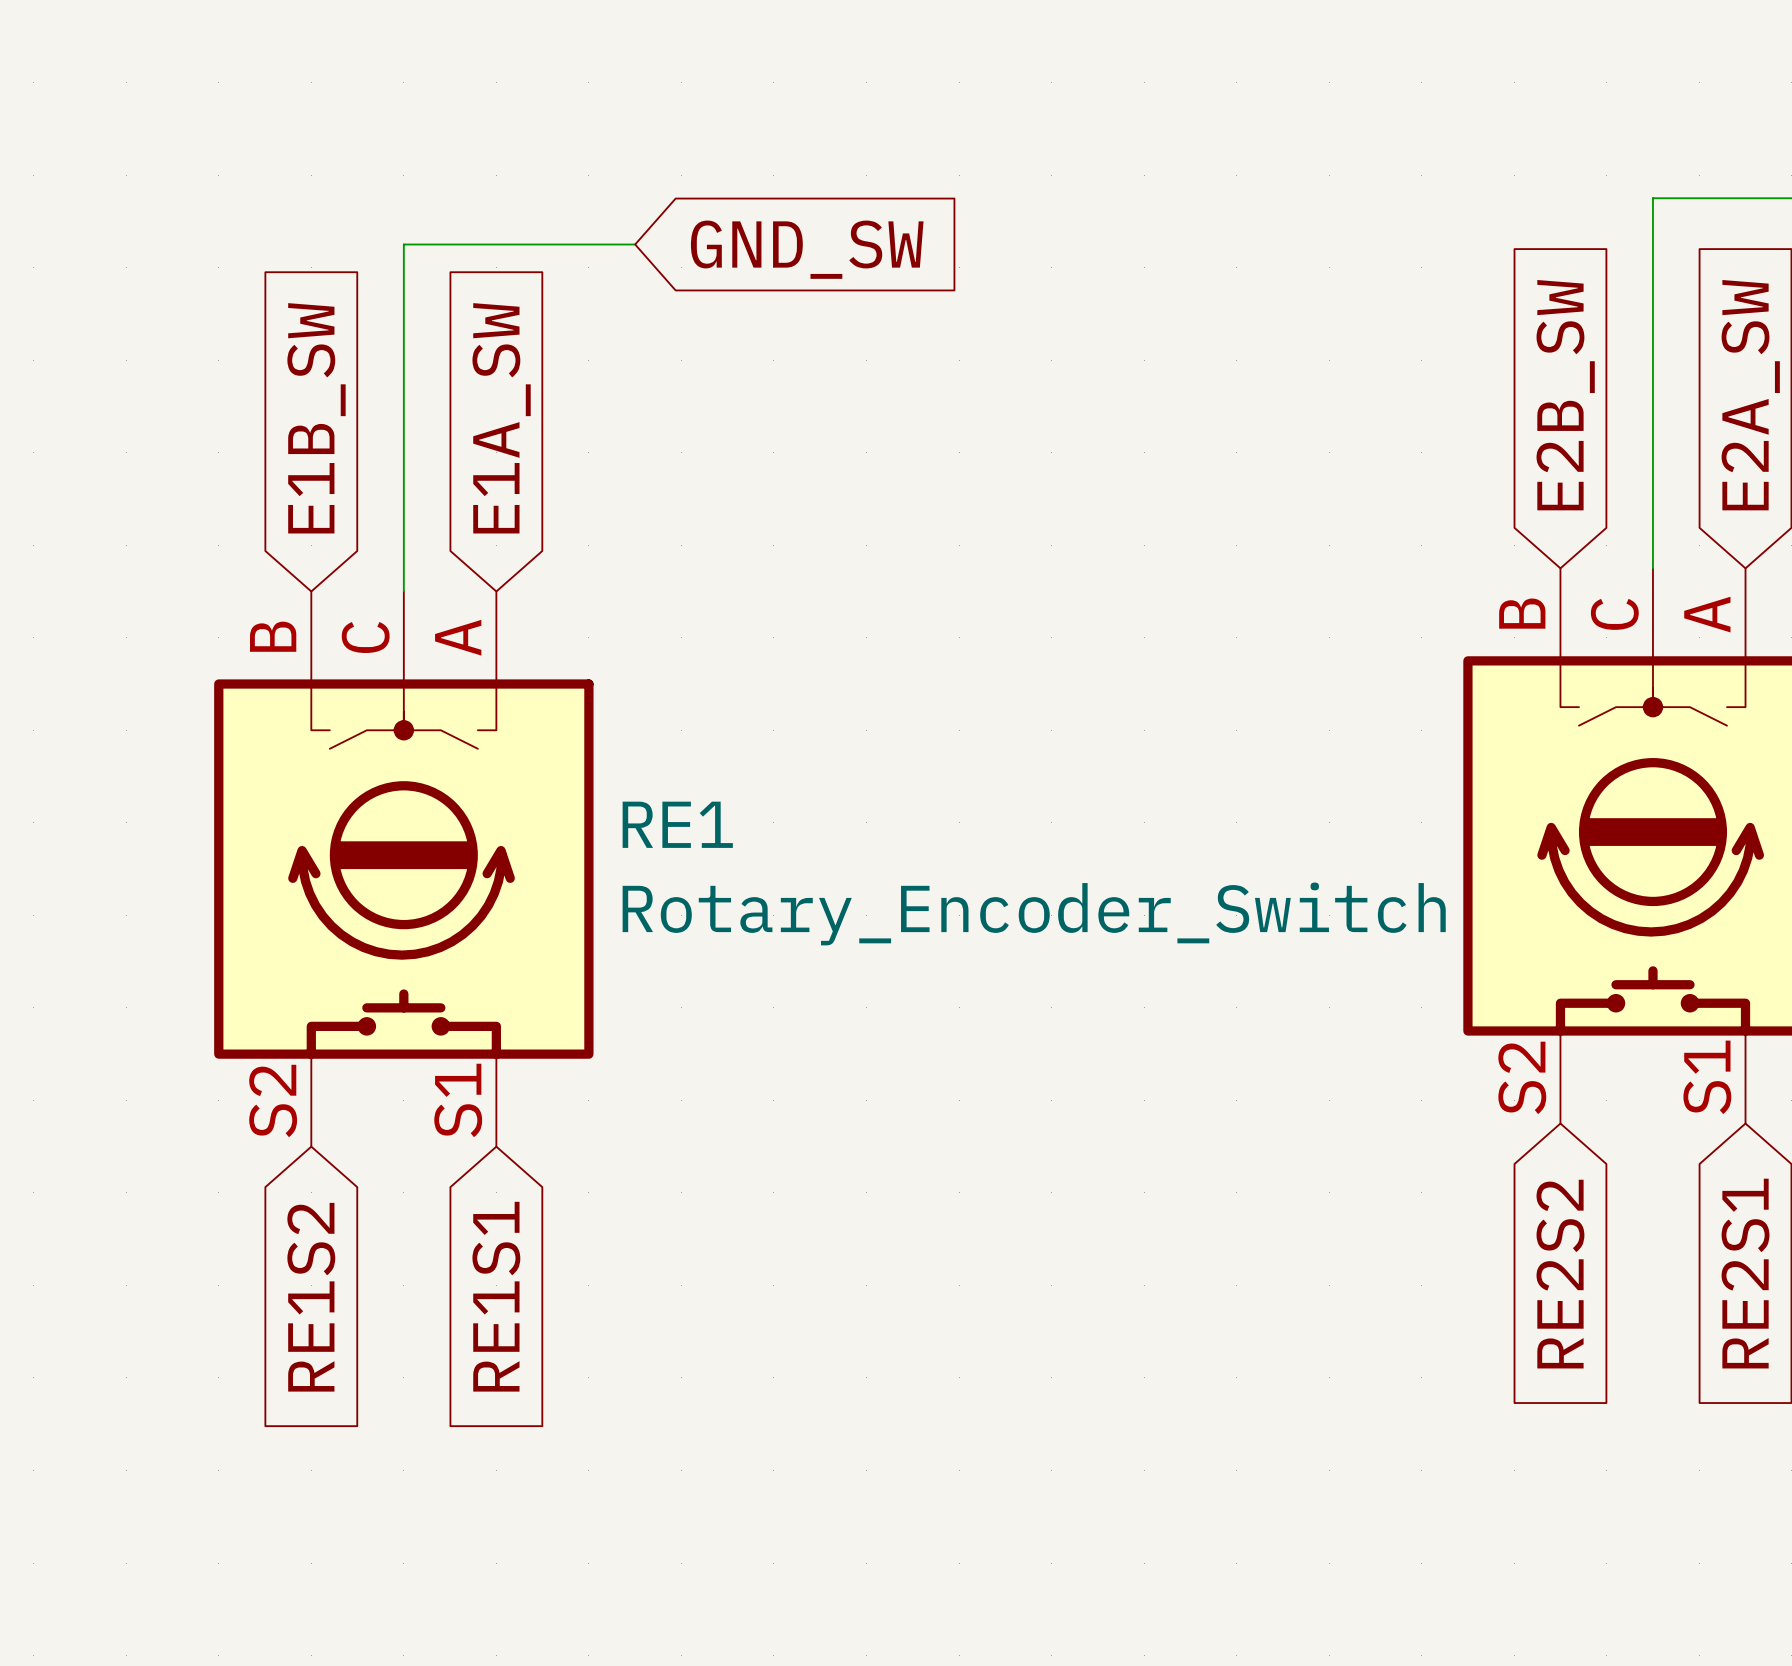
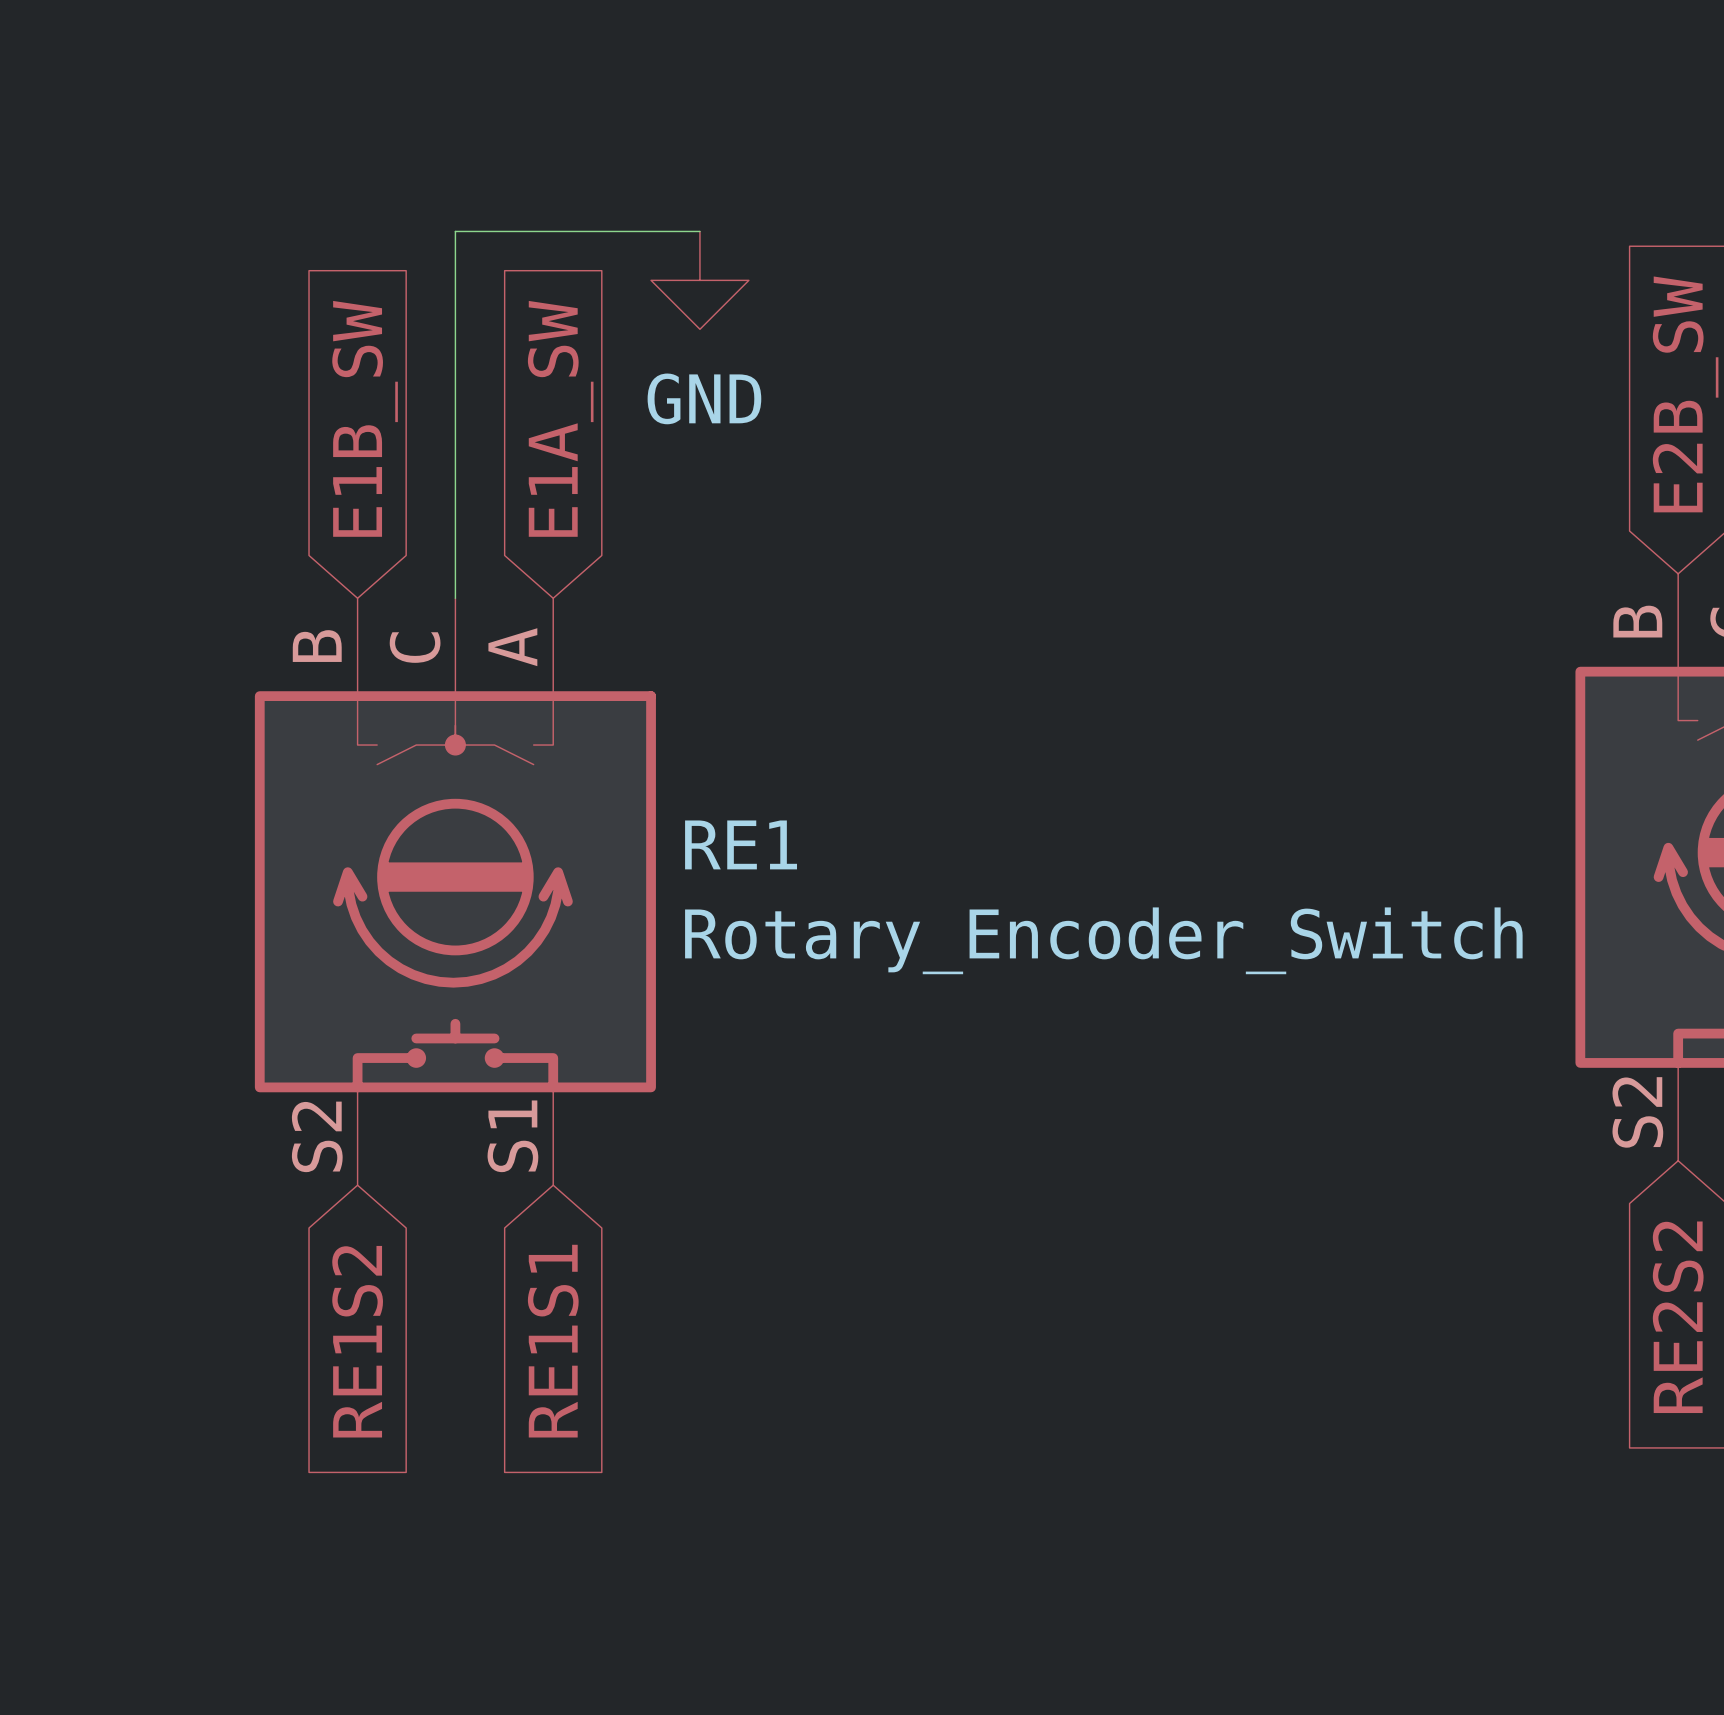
global label: GND_SW (807, 249) -> none
power symbol: none -> GND (699, 280)

